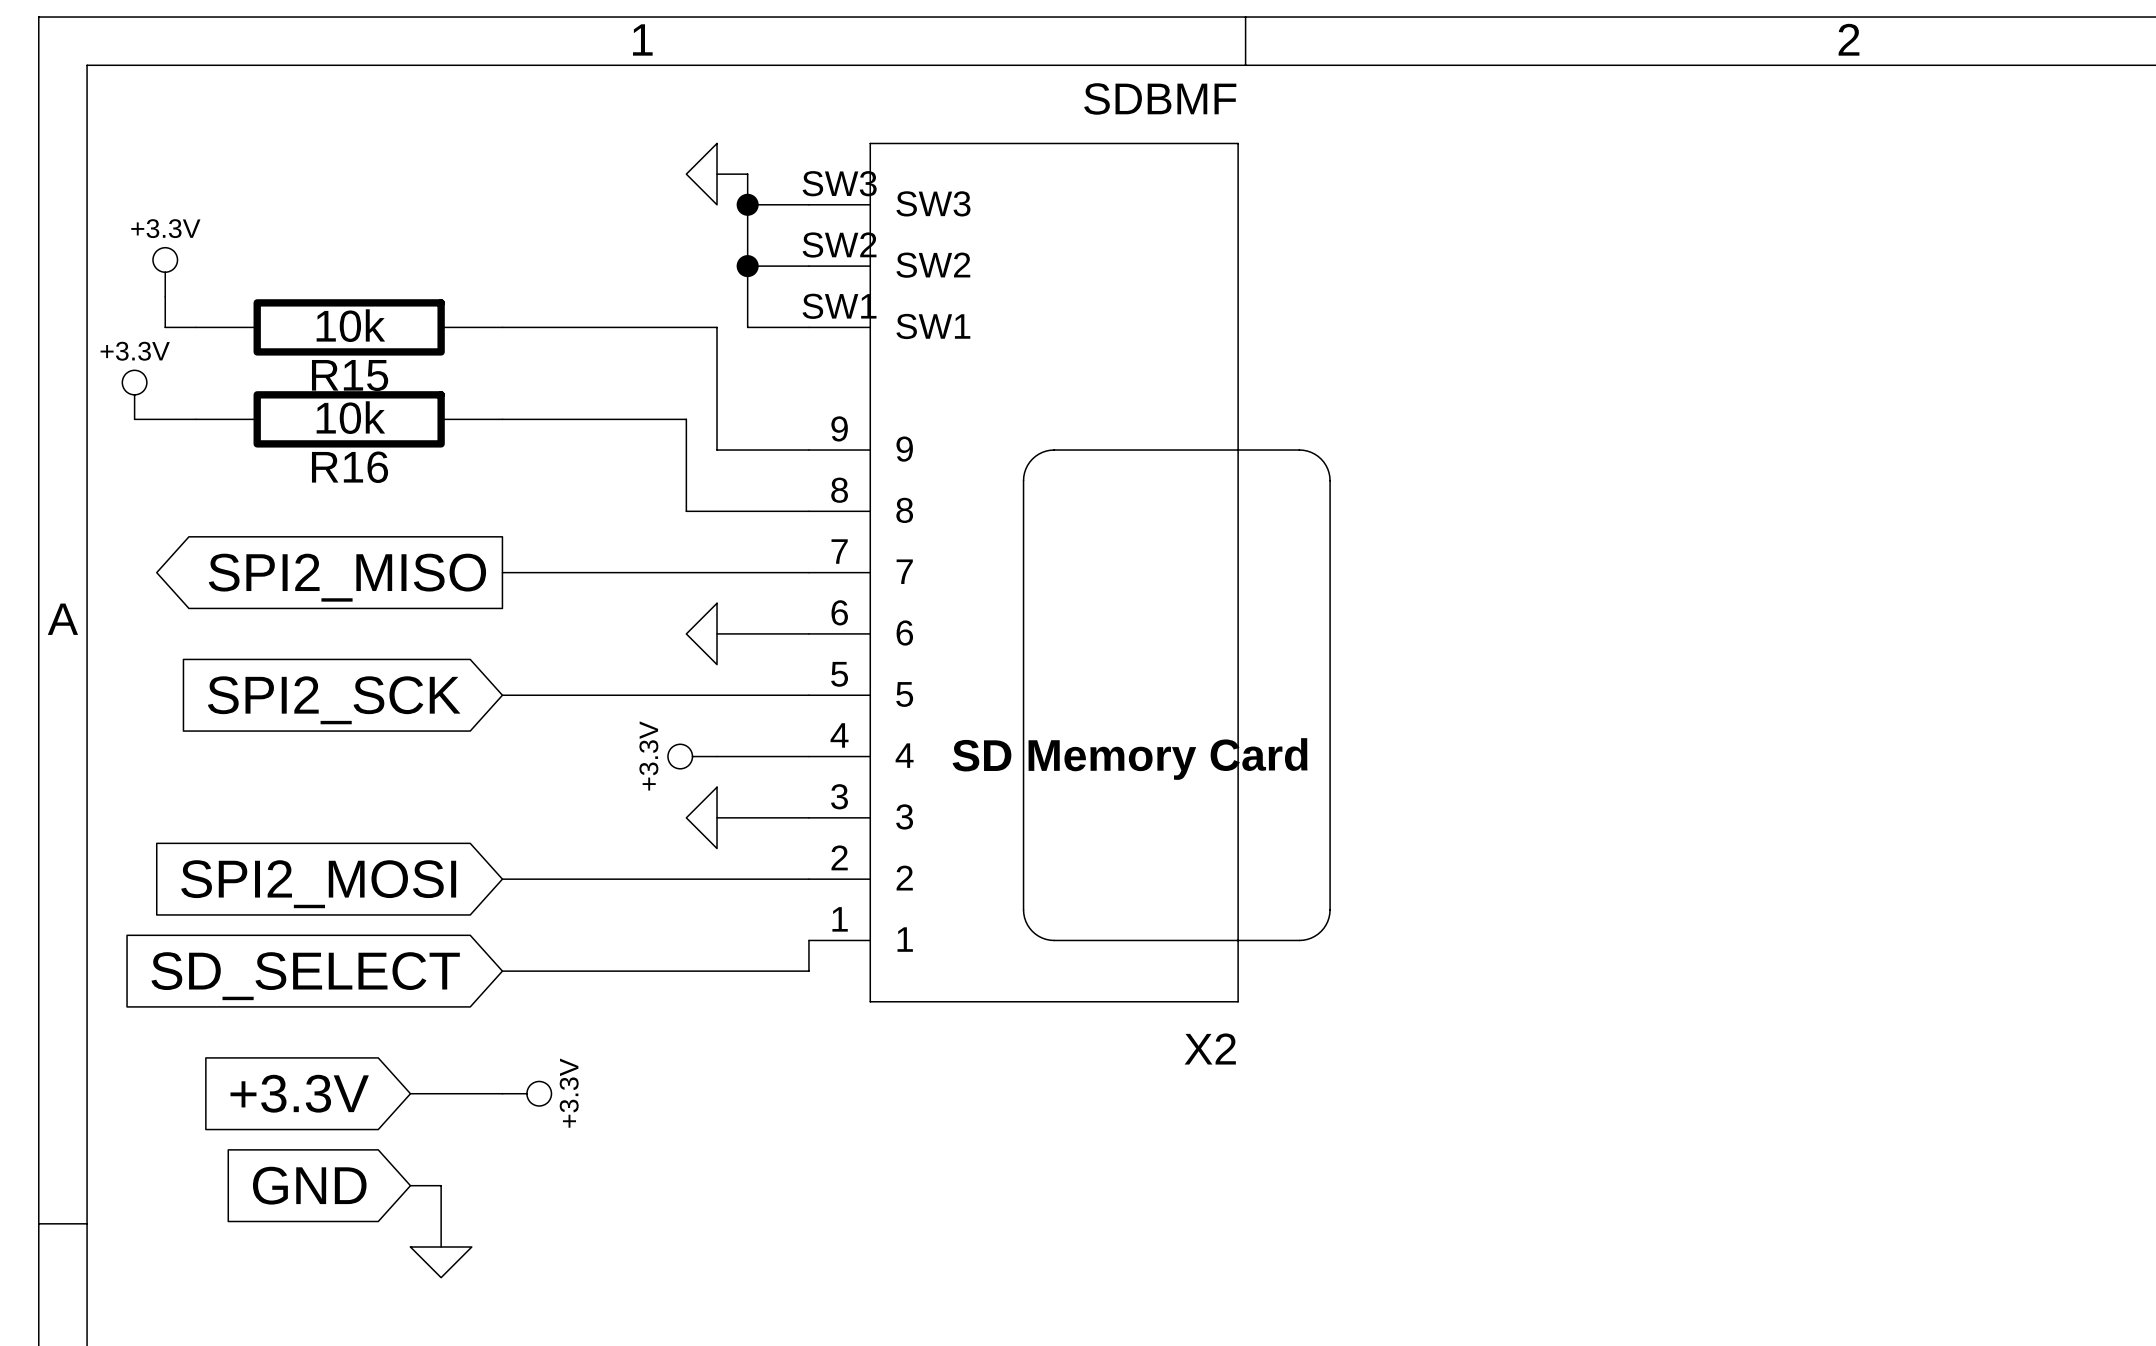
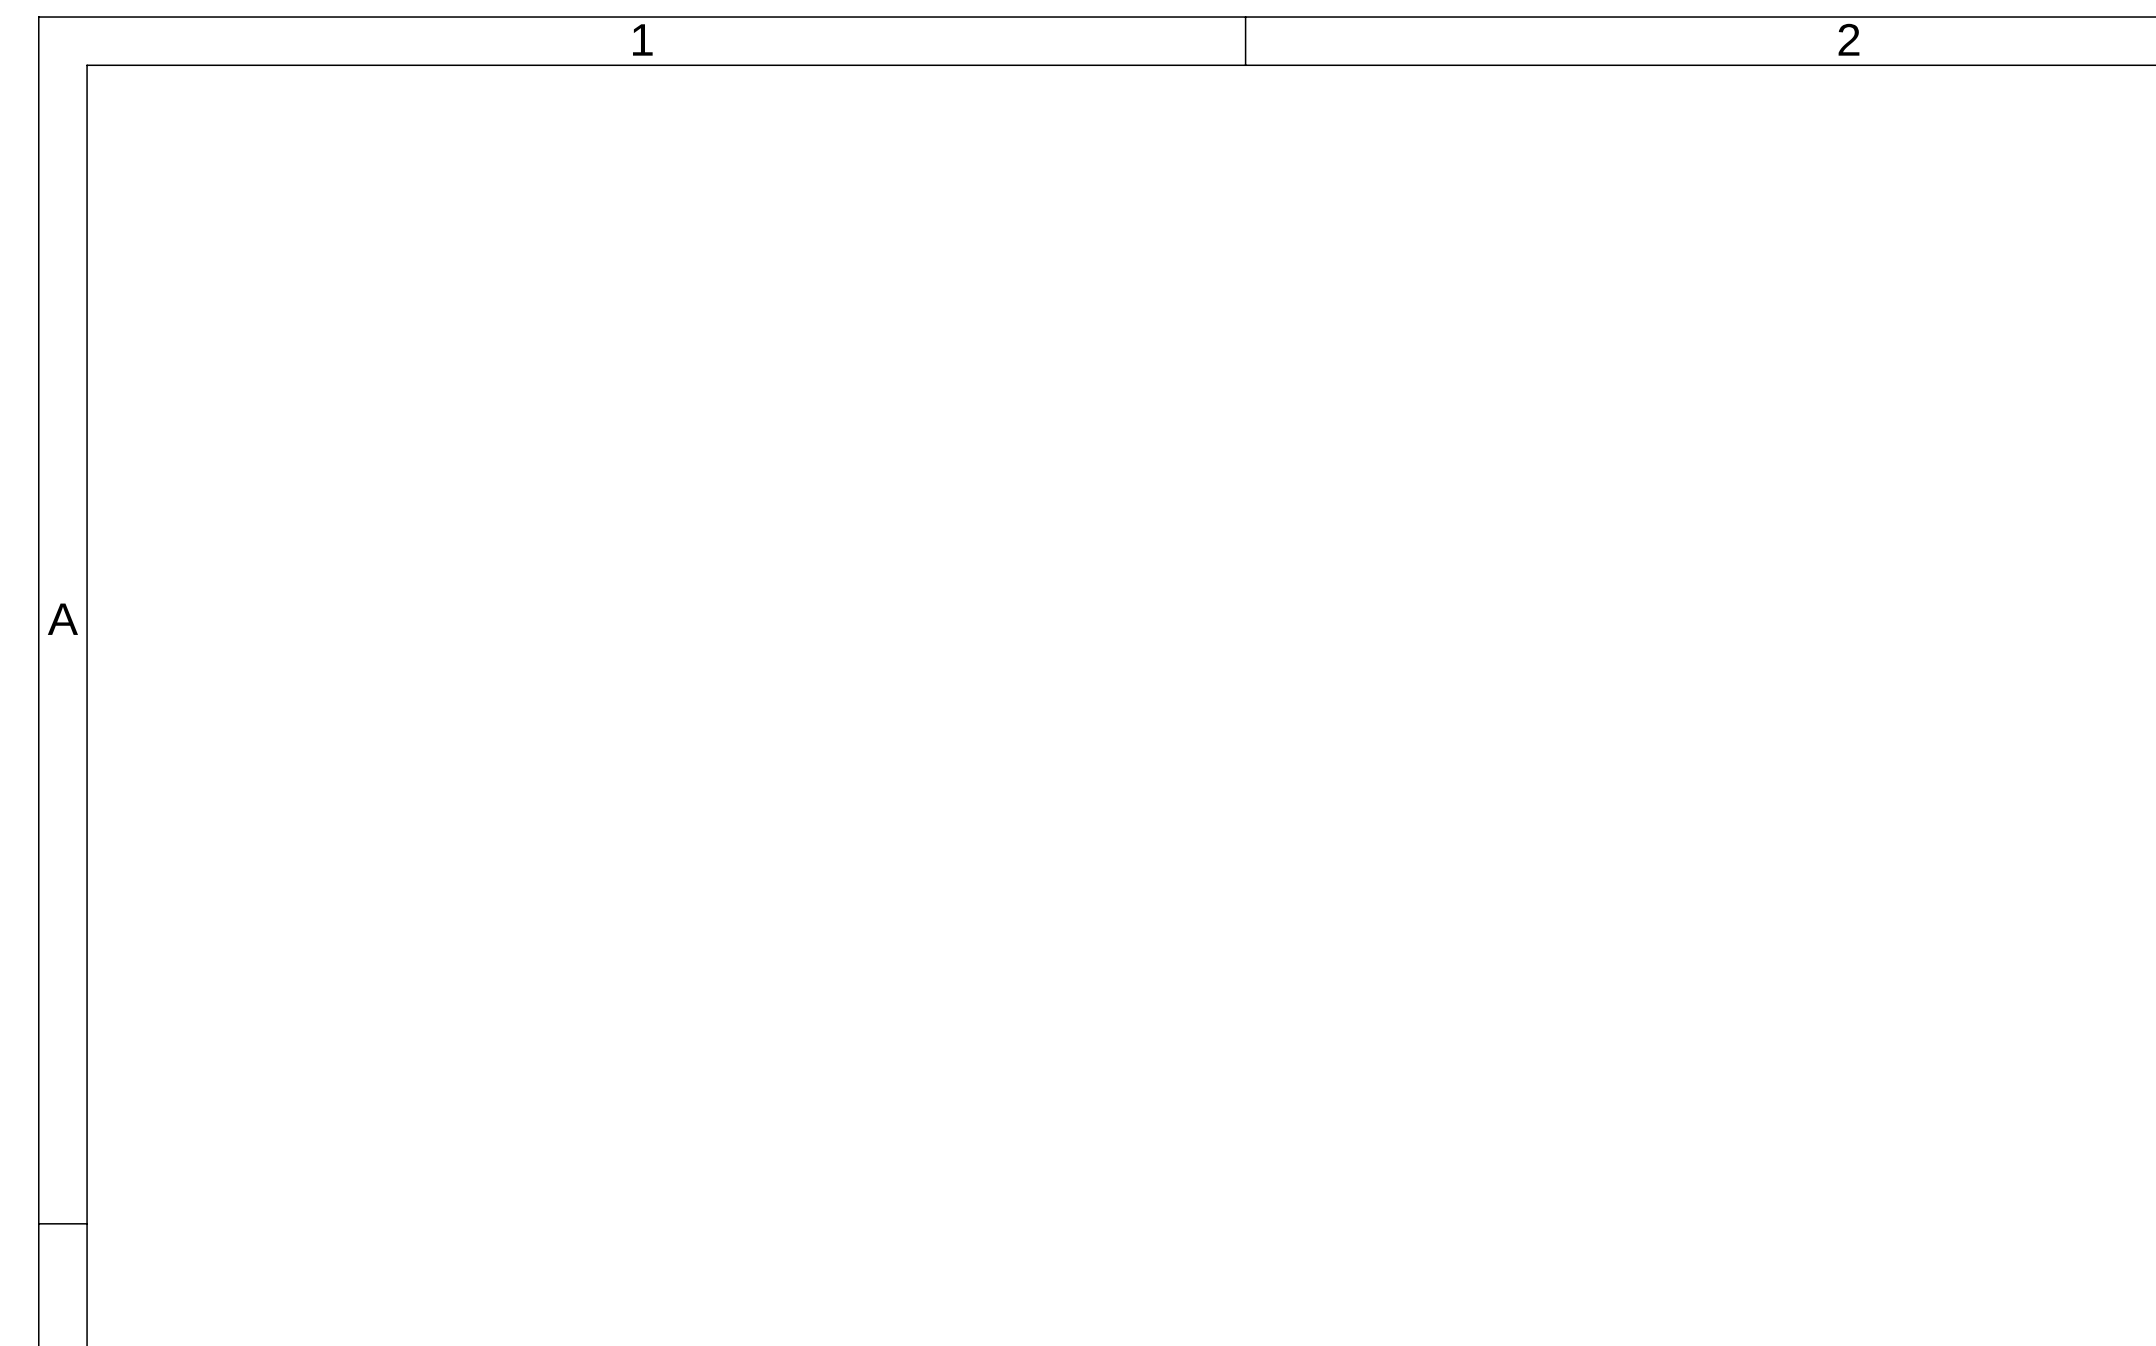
power symbol: (701, 174) -> none
wire: (717, 174) (747, 174) (747, 327) (808, 327) -> none
wire: (747, 204) (808, 204) -> none
junction: (747, 204) -> none
wire: (747, 266) (808, 266) -> none
junction: (747, 266) -> none
power symbol: +3.3V (165, 272) -> none
wire: (165, 296) (165, 327) (195, 327) -> none
R15: 10k (349, 327) -> none
wire: (502, 327) (717, 327) (717, 450) (808, 450) -> none
power symbol: +3.3V (134, 394) -> none
wire: (134, 419) (195, 419) -> none
R16: 10k (349, 419) -> none
wire: (502, 419) (686, 419) (686, 511) (808, 511) -> none
wire: (502, 572) (808, 572) -> none
X2: SDBMF (1069, 572) -> none
global label: SPI2_MISO (347, 577) -> none
power symbol: (701, 633) -> none
wire: (717, 633) (808, 633) -> none
wire: (502, 695) (808, 695) -> none
global label: SPI2_SCK (334, 700) -> none
power symbol: +3.3V (692, 756) -> none
wire: (717, 756) (808, 756) -> none
power symbol: (701, 817) -> none
wire: (717, 817) (808, 817) -> none
wire: (502, 879) (808, 879) -> none
global label: SPI2_MOSI (318, 884) -> none
wire: (808, 940) (808, 971) (502, 971) -> none
global label: SD_SELECT (305, 976) -> none
global label: +3.3V (299, 1093) -> none
wire: (410, 1093) (502, 1093) -> none
power symbol: +3.3V (526, 1093) -> none
global label: GND (309, 1185) -> none
wire: (410, 1185) (441, 1185) (441, 1247) -> none
power symbol: (441, 1262) -> none

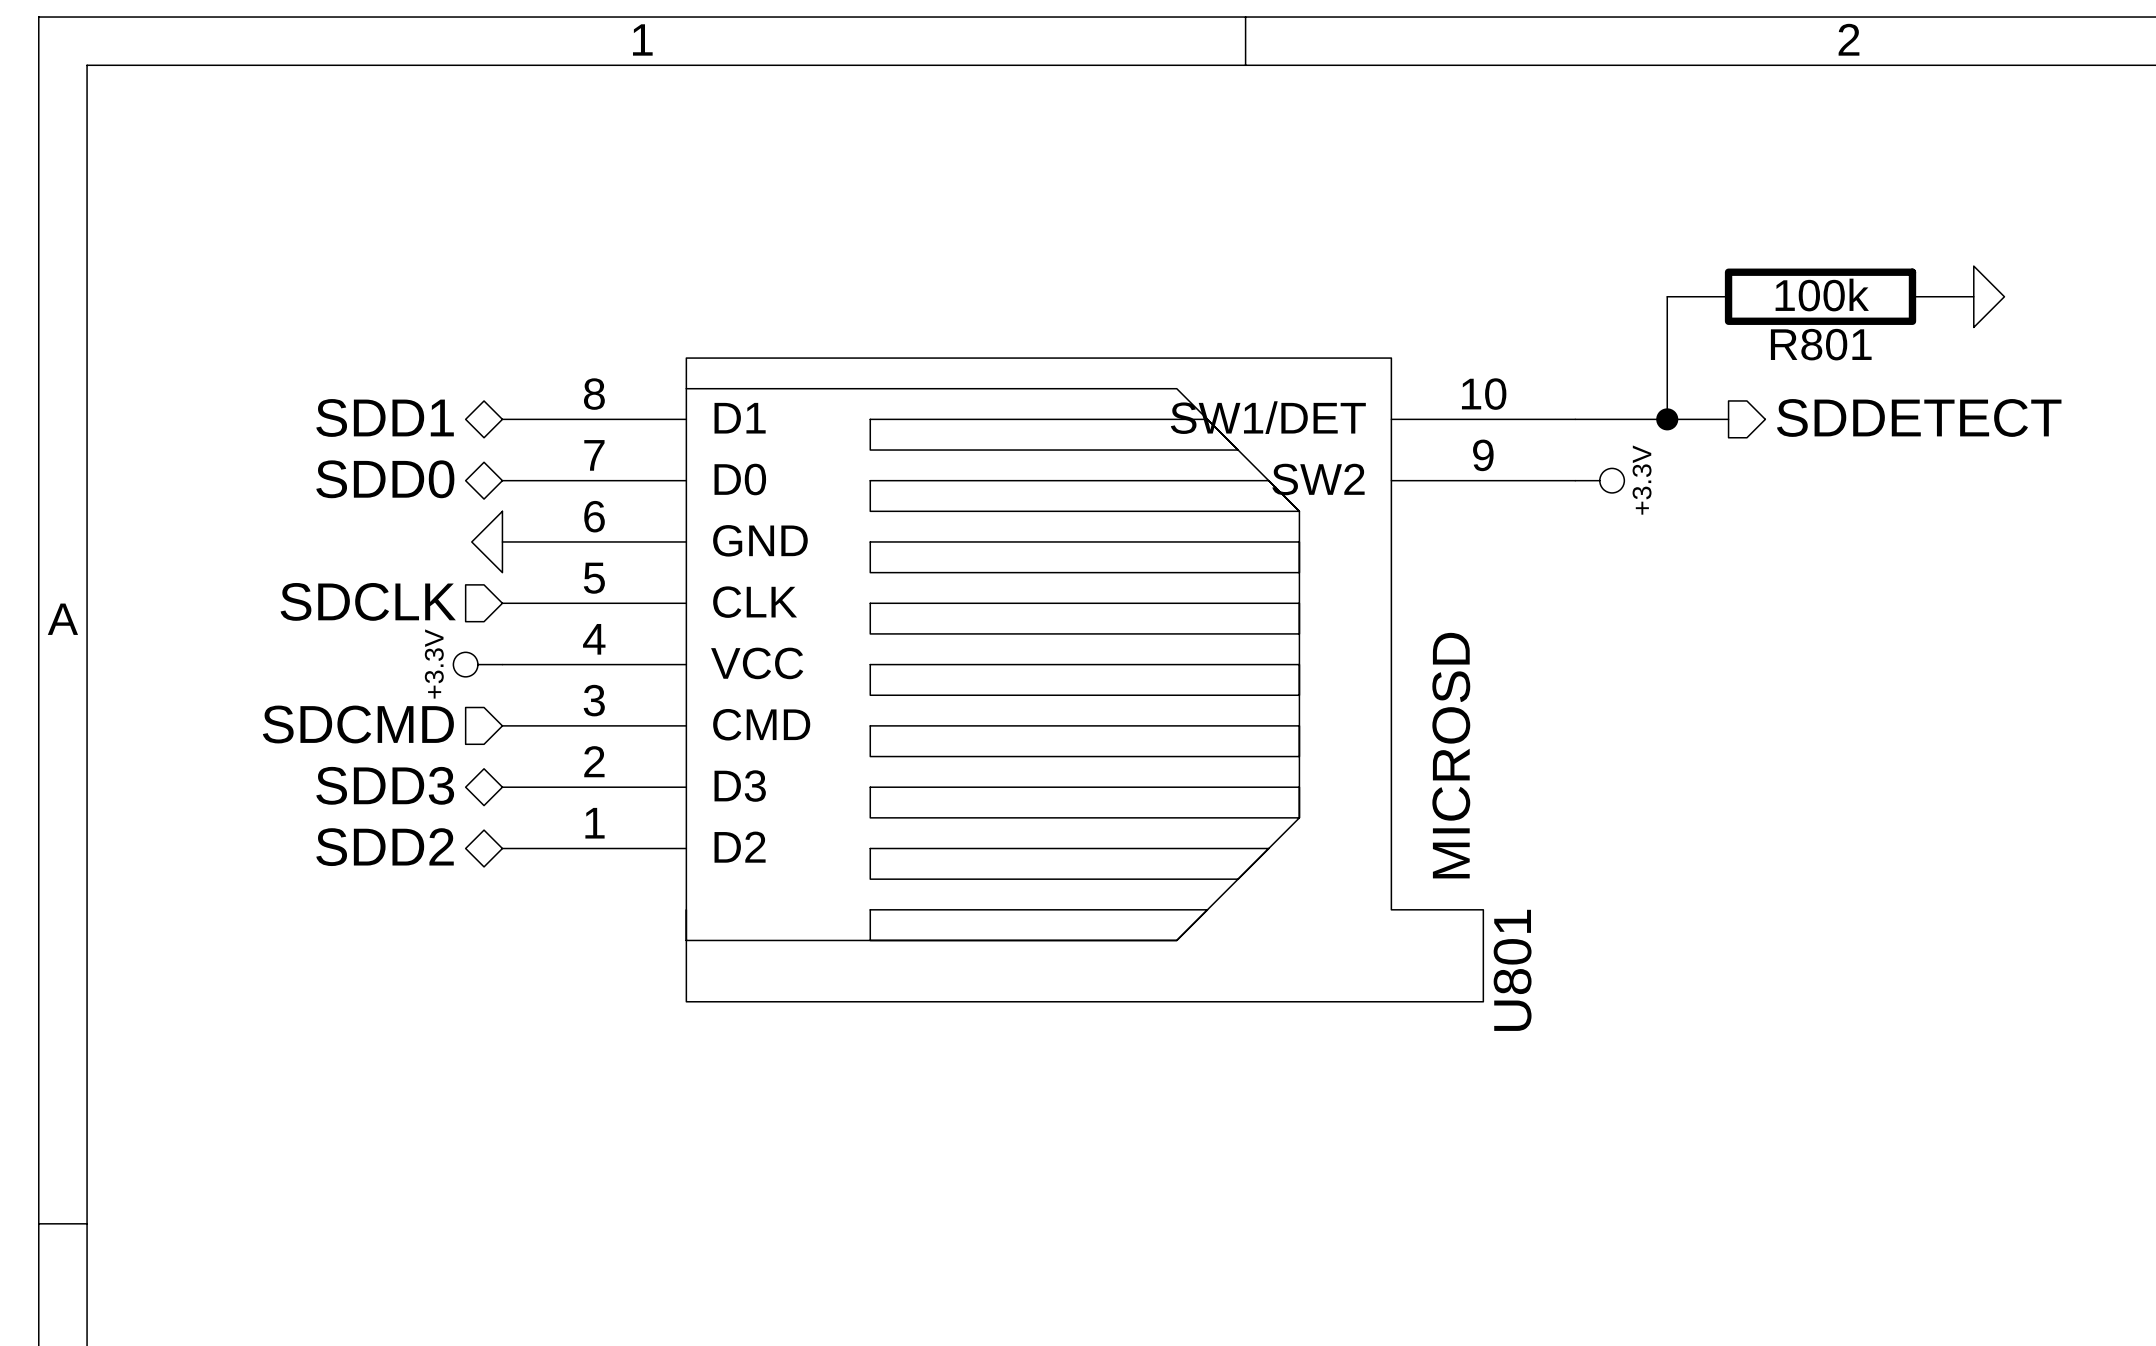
wire: none -> (1667, 296) (1667, 419)
R801: none -> 100k (1820, 296)
power symbol: none -> (1989, 296)
hierarchical label: none -> SDD1 (385, 417)
hierarchical label: none -> SDDETECT (1919, 417)
wire: none -> (1575, 419) (1728, 419)
junction: none -> (1667, 419)
hierarchical label: none -> SDD0 (385, 479)
power symbol: none -> +3.3V (1599, 480)
power symbol: none -> (487, 541)
hierarchical label: none -> SDCLK (368, 601)
power symbol: none -> +3.3V (477, 664)
U801: none -> MICROSD (1038, 679)
hierarchical label: none -> SDCMD (358, 724)
hierarchical label: none -> SDD3 (385, 785)
hierarchical label: none -> SDD2 (385, 847)

